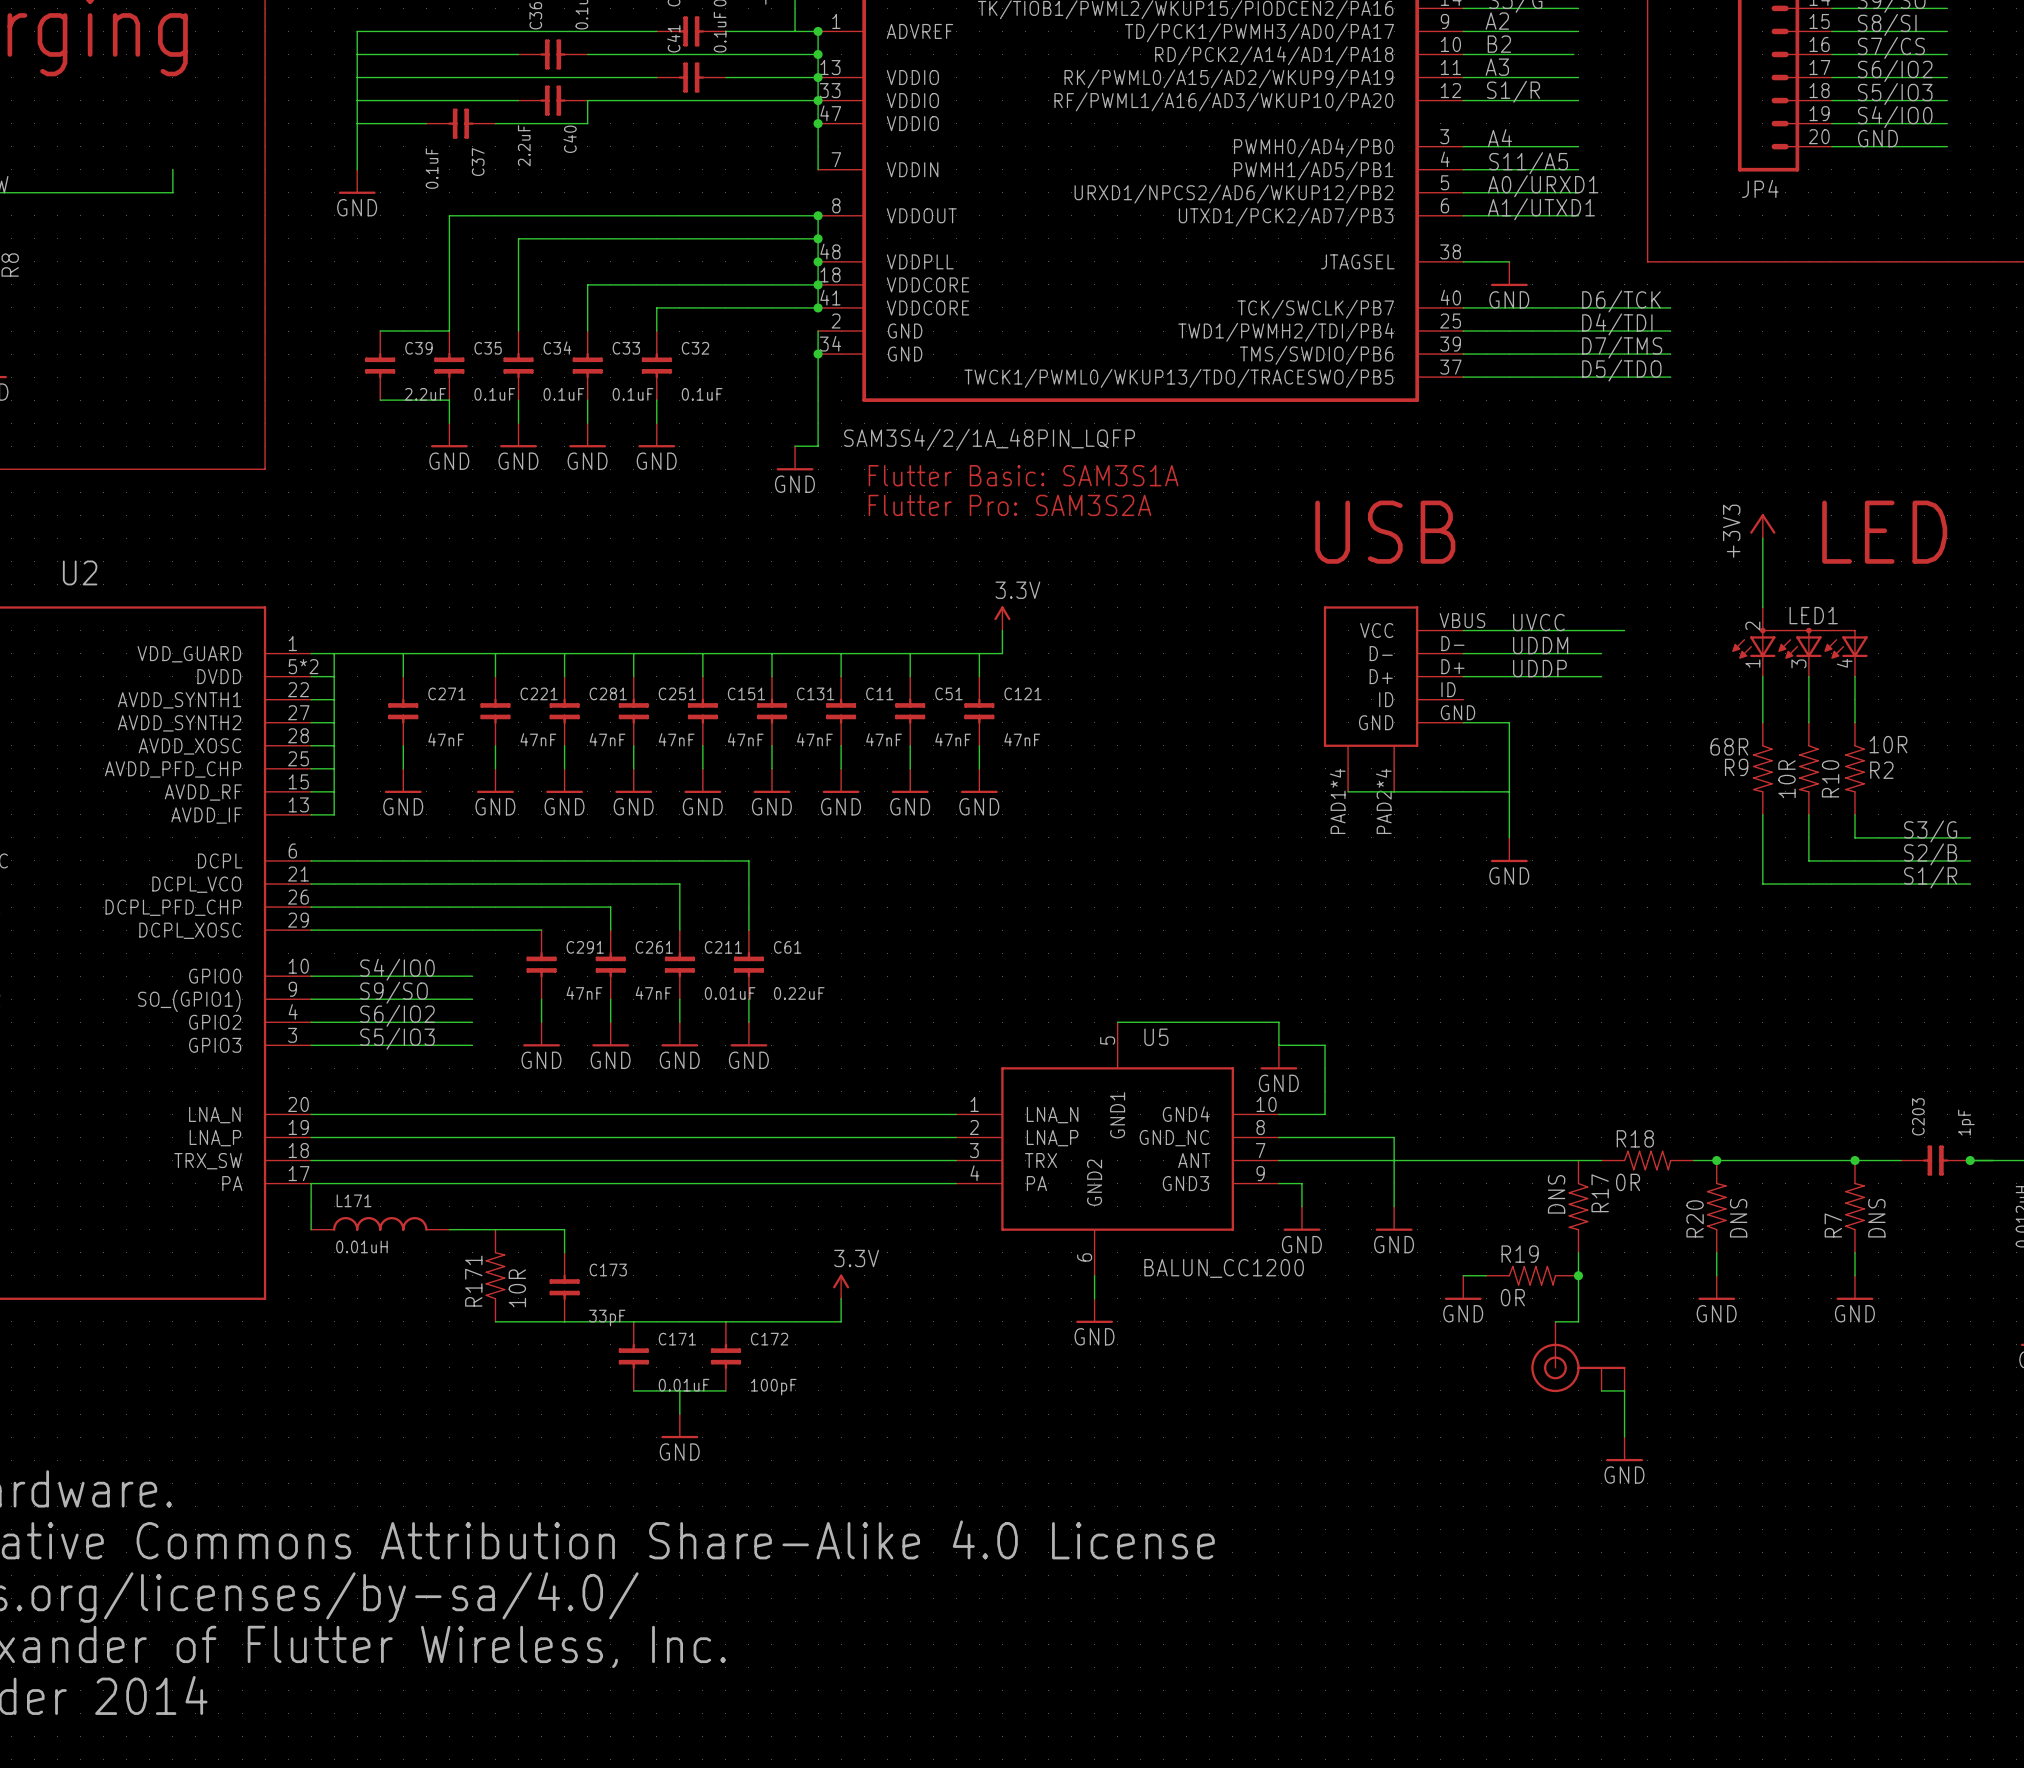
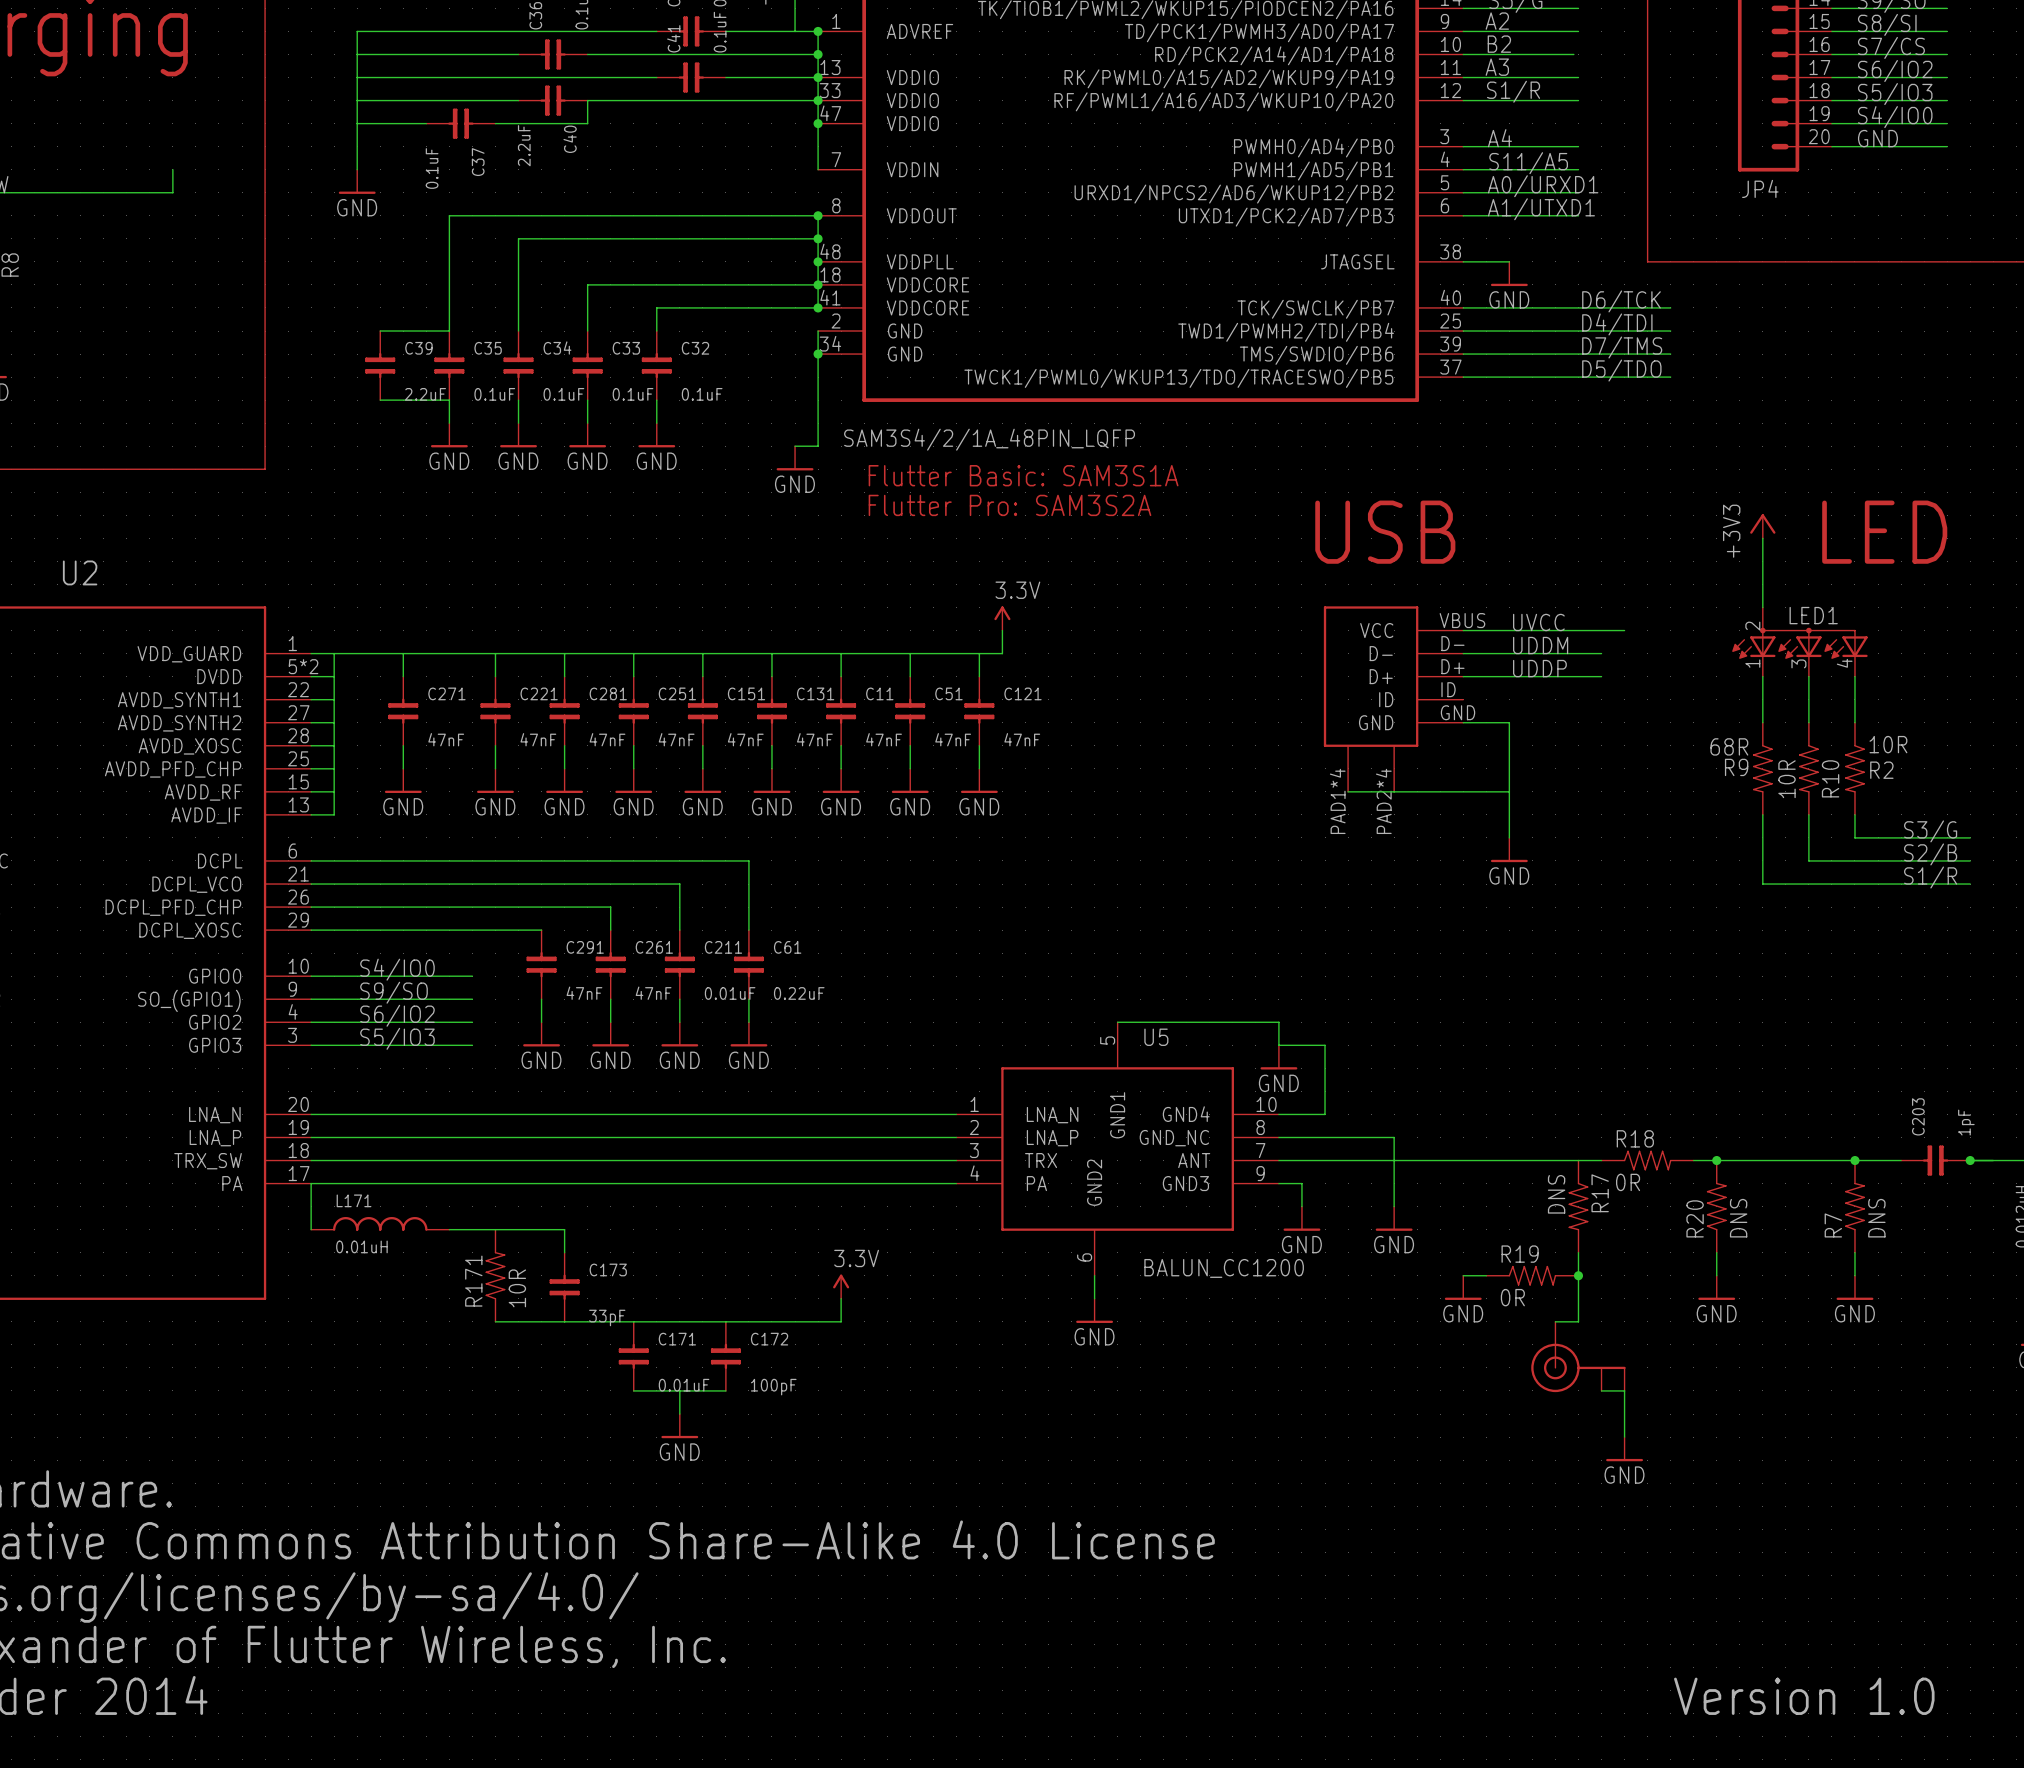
text: none -> Version 1.0 (1804, 1696)

